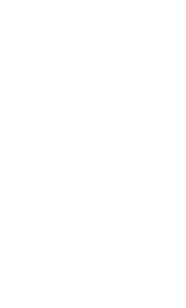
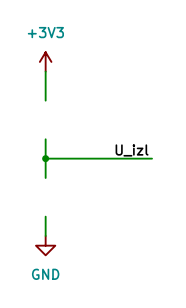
power symbol: none -> +3V3 (45, 61)
wire: none -> (45, 71) (45, 100)
wire: none -> (45, 139) (45, 177)
label: none -> U_izl (132, 150)
wire: none -> (45, 158) (152, 158)
junction: none -> (45, 158)
wire: none -> (45, 216) (45, 235)
power symbol: none -> GND (45, 245)

